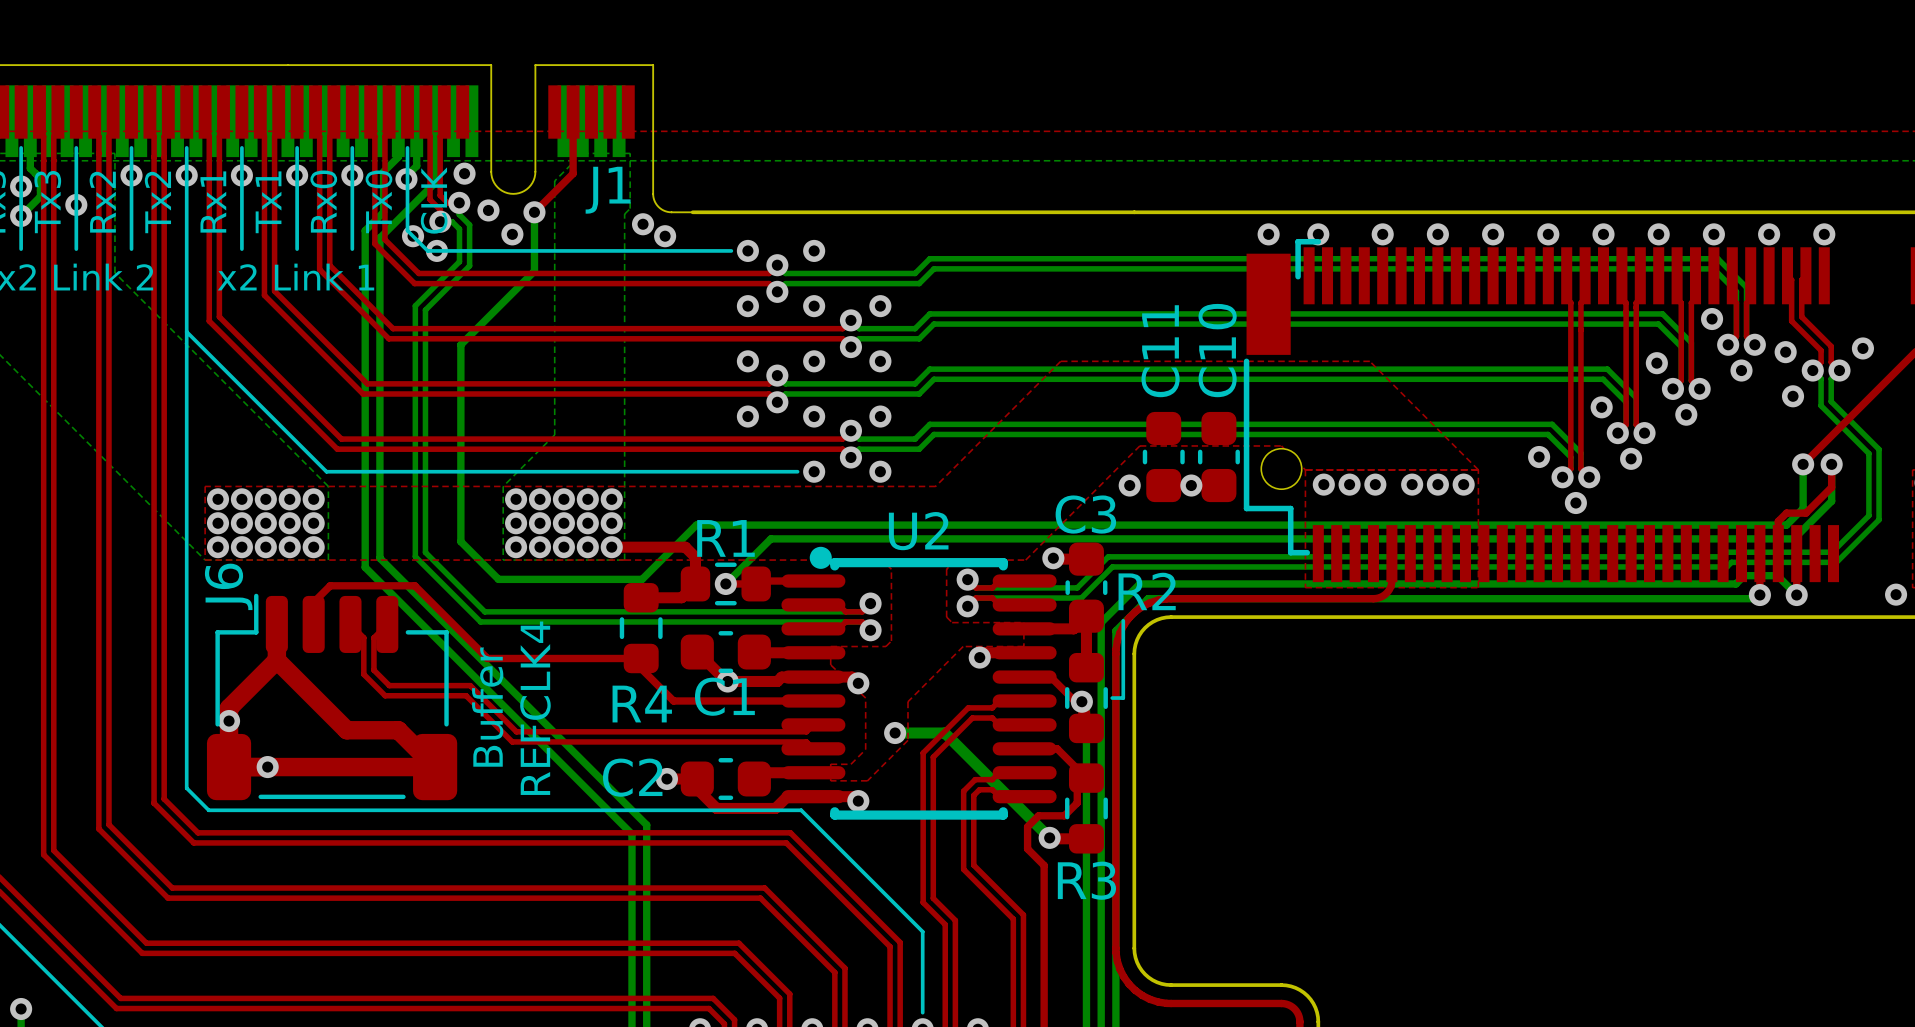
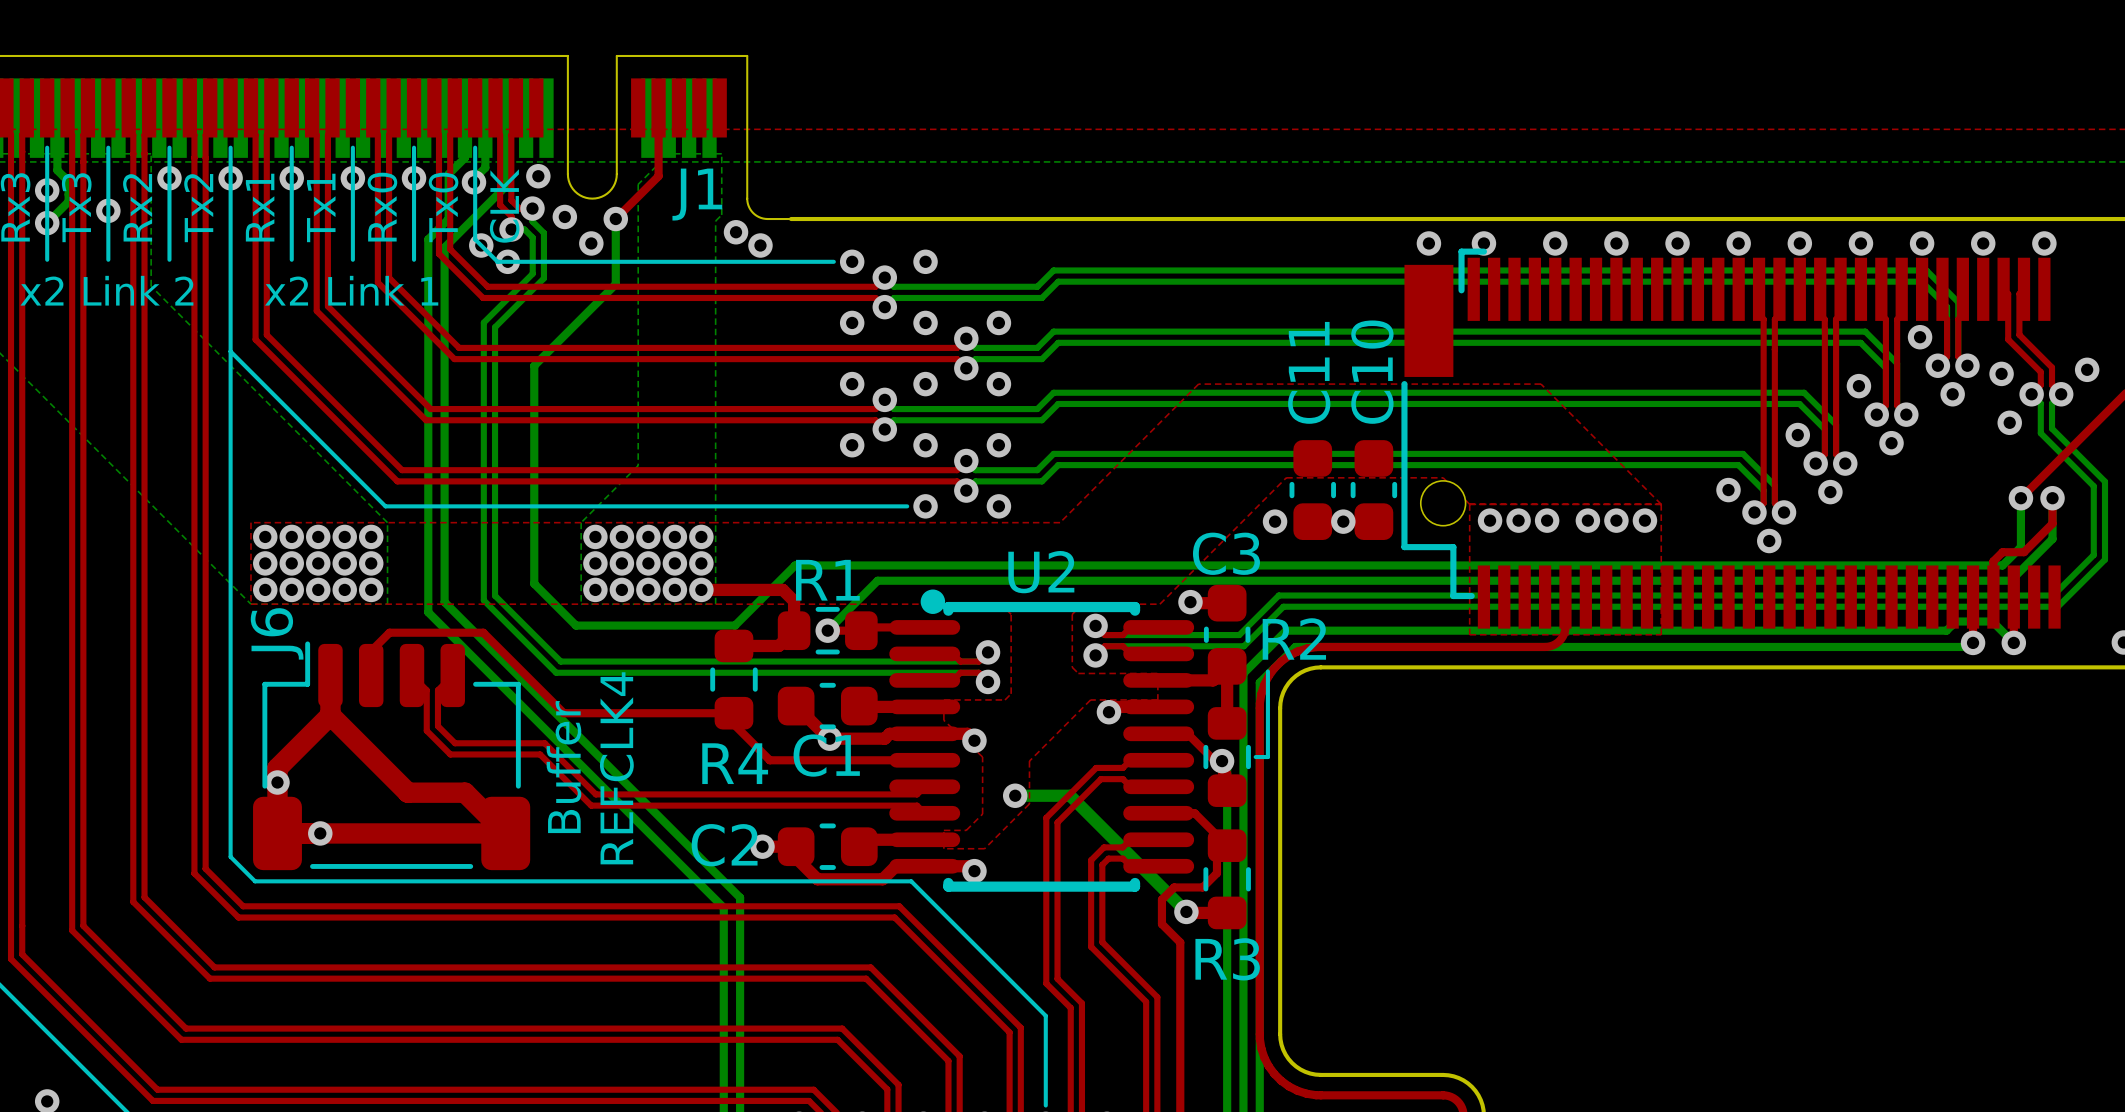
bottom track: (1727, 552) (1722, 556) (1108, 556) (1077, 587) -> (1937, 595) (1278, 595) (1239, 635) (1216, 635)
bottom track: (1731, 562) (1726, 566) (1112, 566) (1081, 598) -> (1941, 606) (1283, 606) (1243, 646) (1221, 646)

